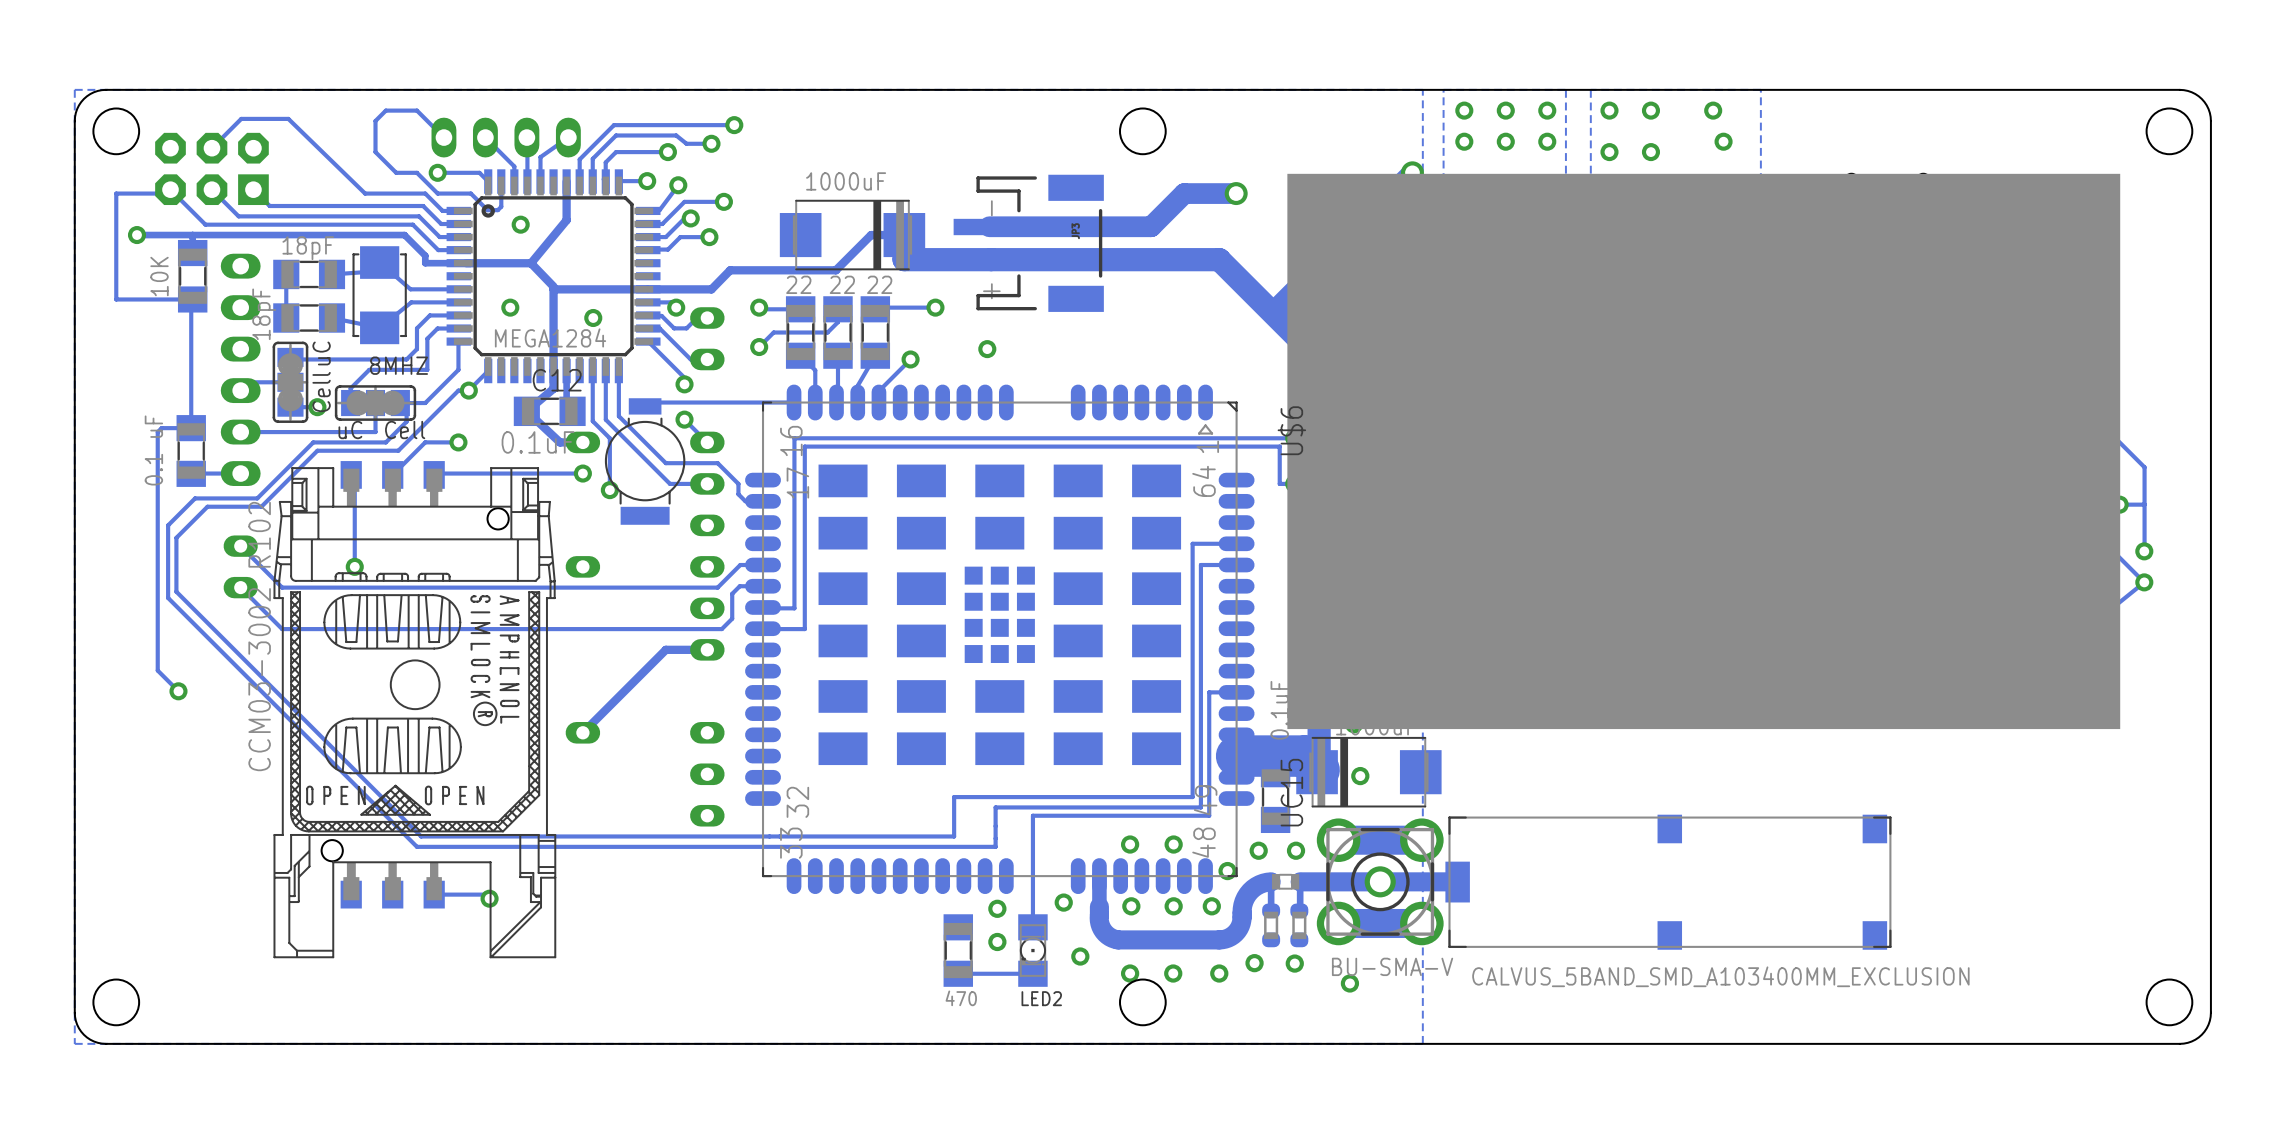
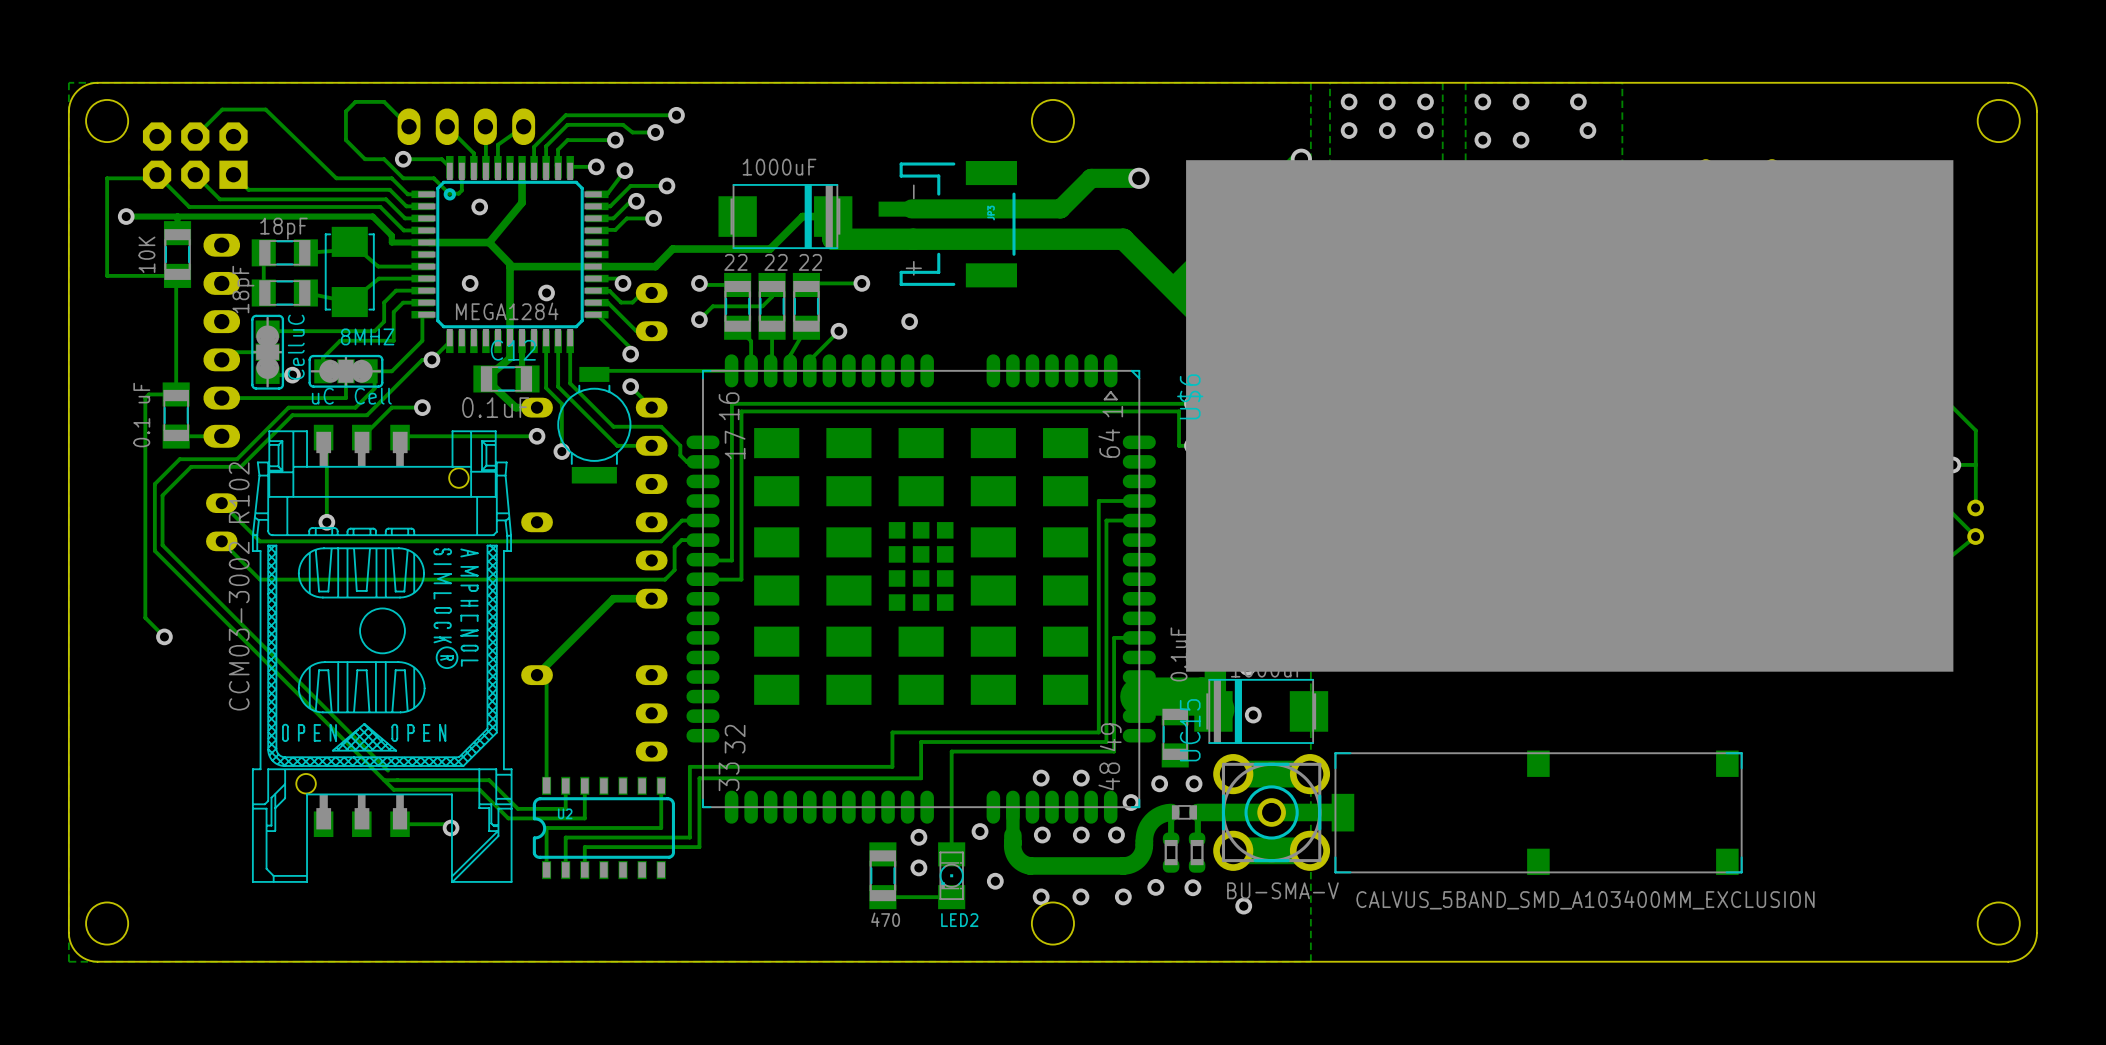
track: none -> (537, 675) (546, 675) (546, 785)
track: (1192, 795) (1192, 797) (954, 797) (954, 836) (421, 836) -> (1098, 732) (892, 732) (892, 766) (689, 766) (689, 837) (565, 837) (565, 870)
track: (1200, 805) (1200, 807) (995, 807) (995, 846) (531, 846) -> (1106, 742) (921, 742) (921, 778) (699, 778) (699, 847) (584, 847) (584, 870)
track: none -> (384, 780) (393, 789) (479, 789) (508, 818) (584, 818) (584, 785)
track: none -> (489, 780) (517, 808) (565, 808) (565, 785)
track: none -> (661, 785) (661, 827) (546, 827) (546, 870)
U2: none -> (603, 827)

